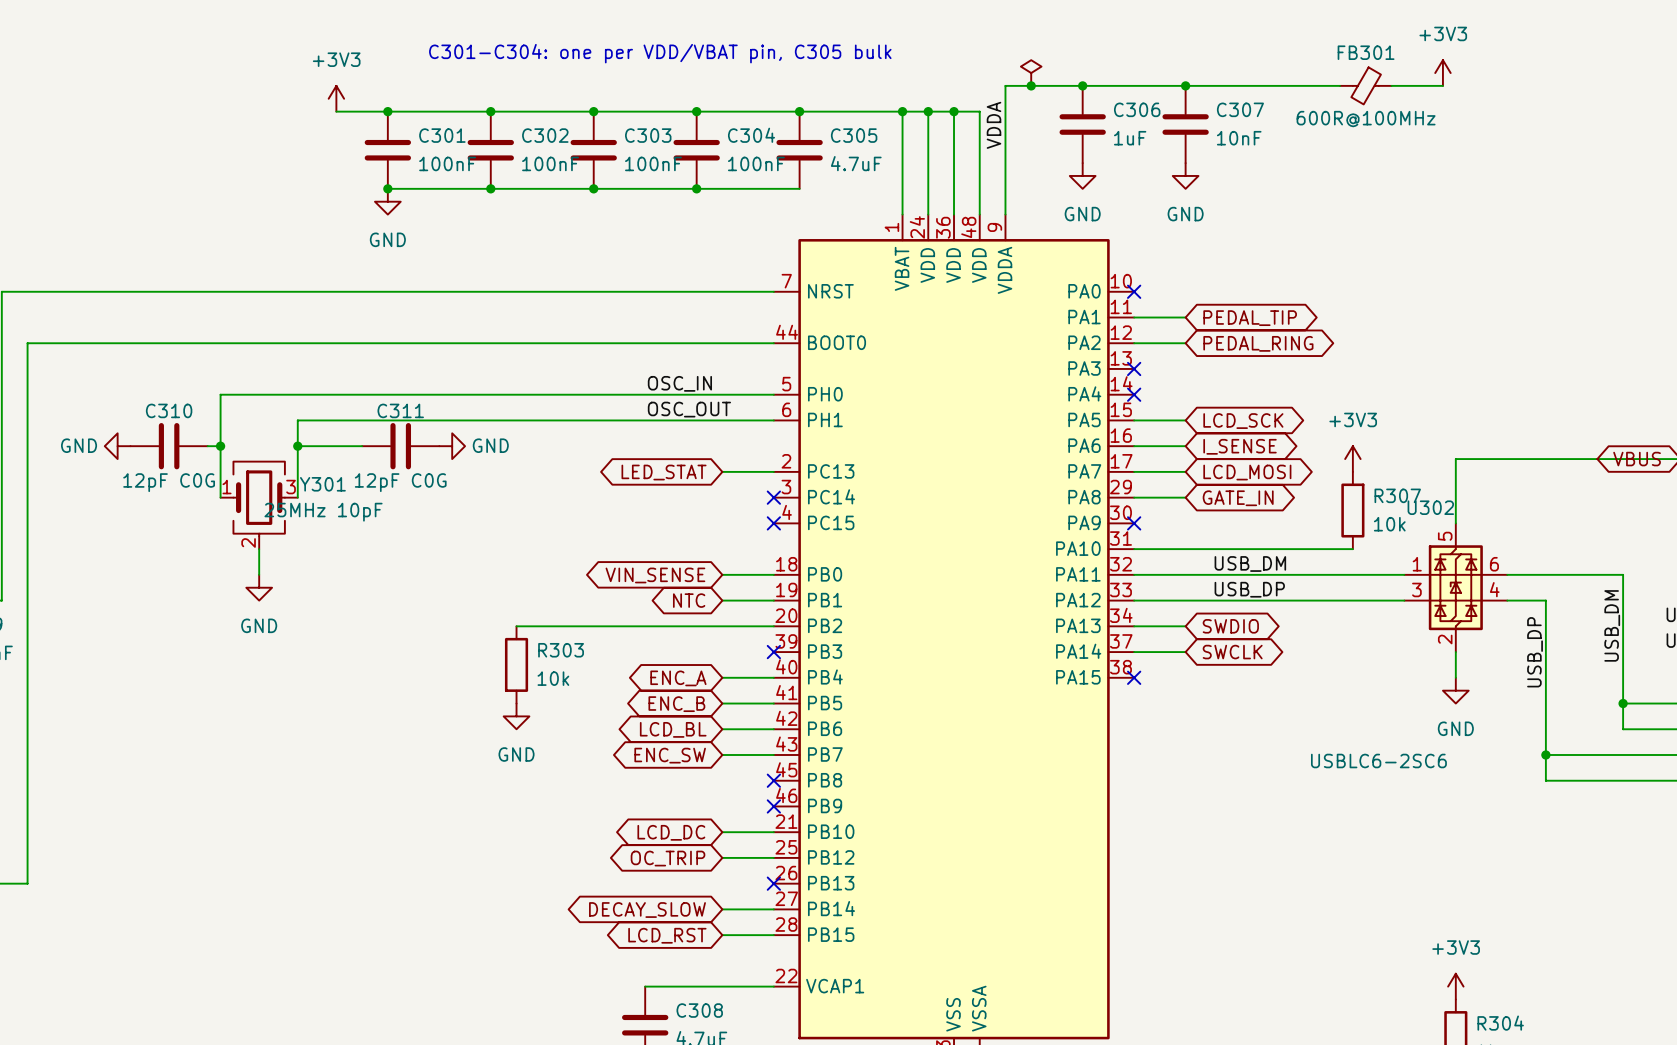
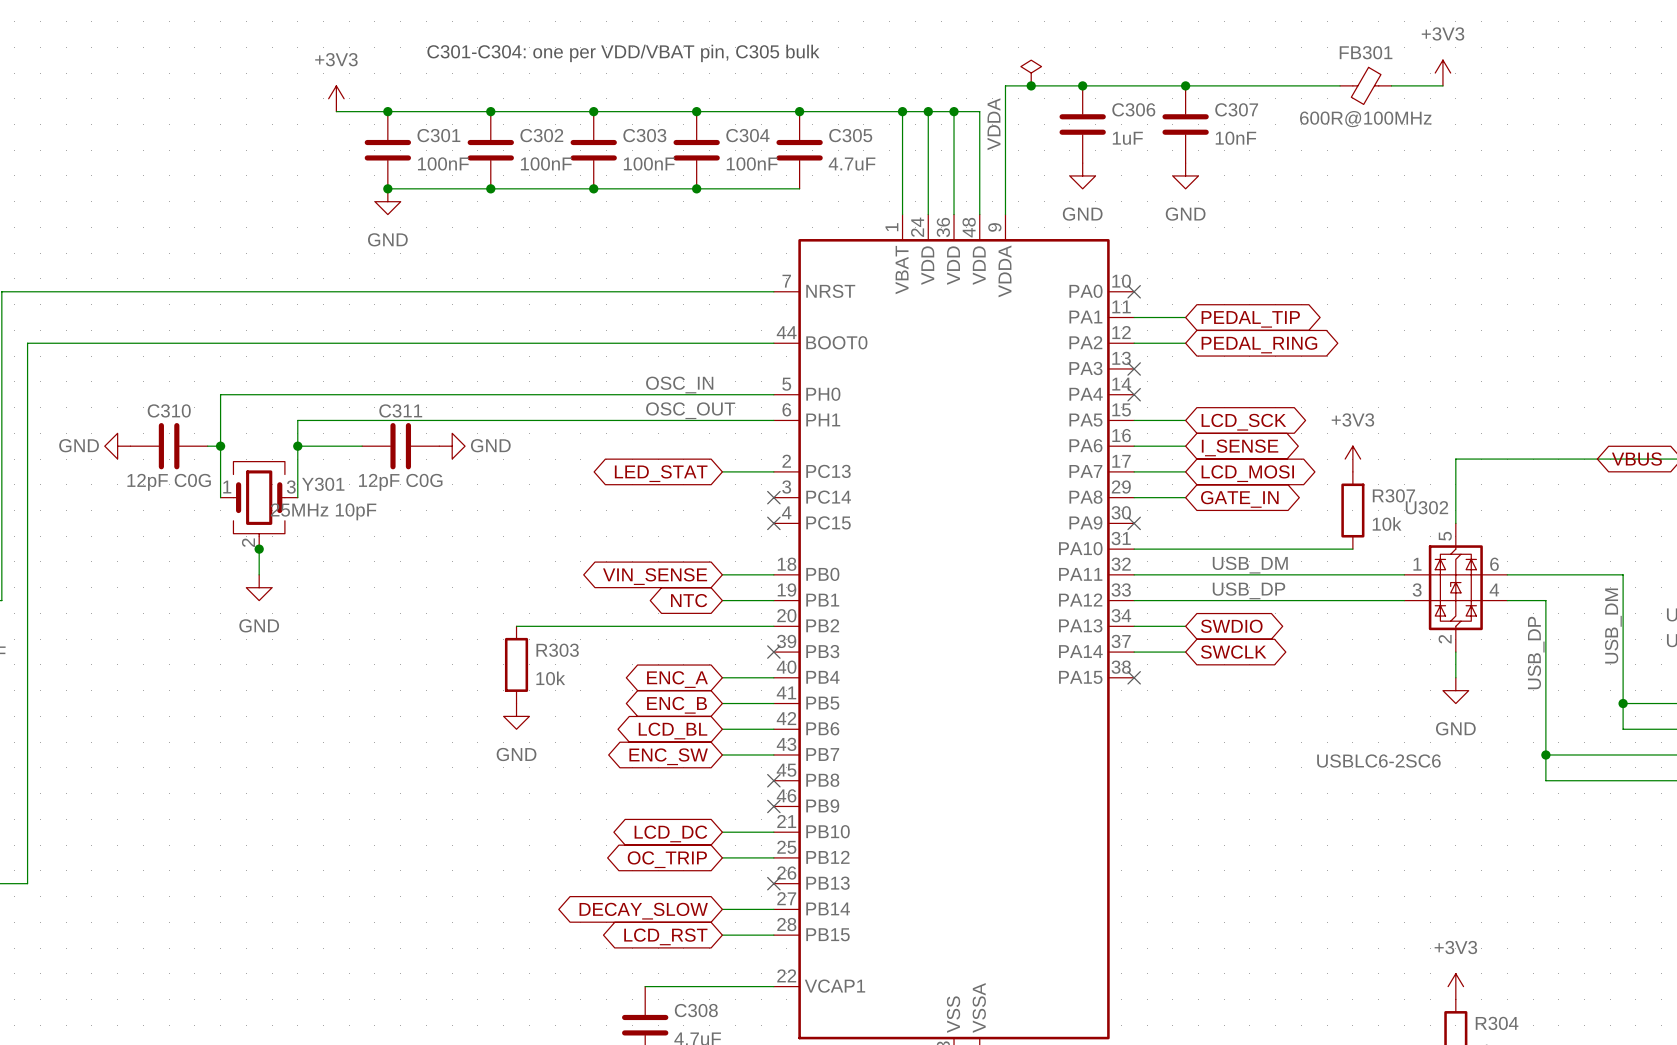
junction: none -> (259, 549)

